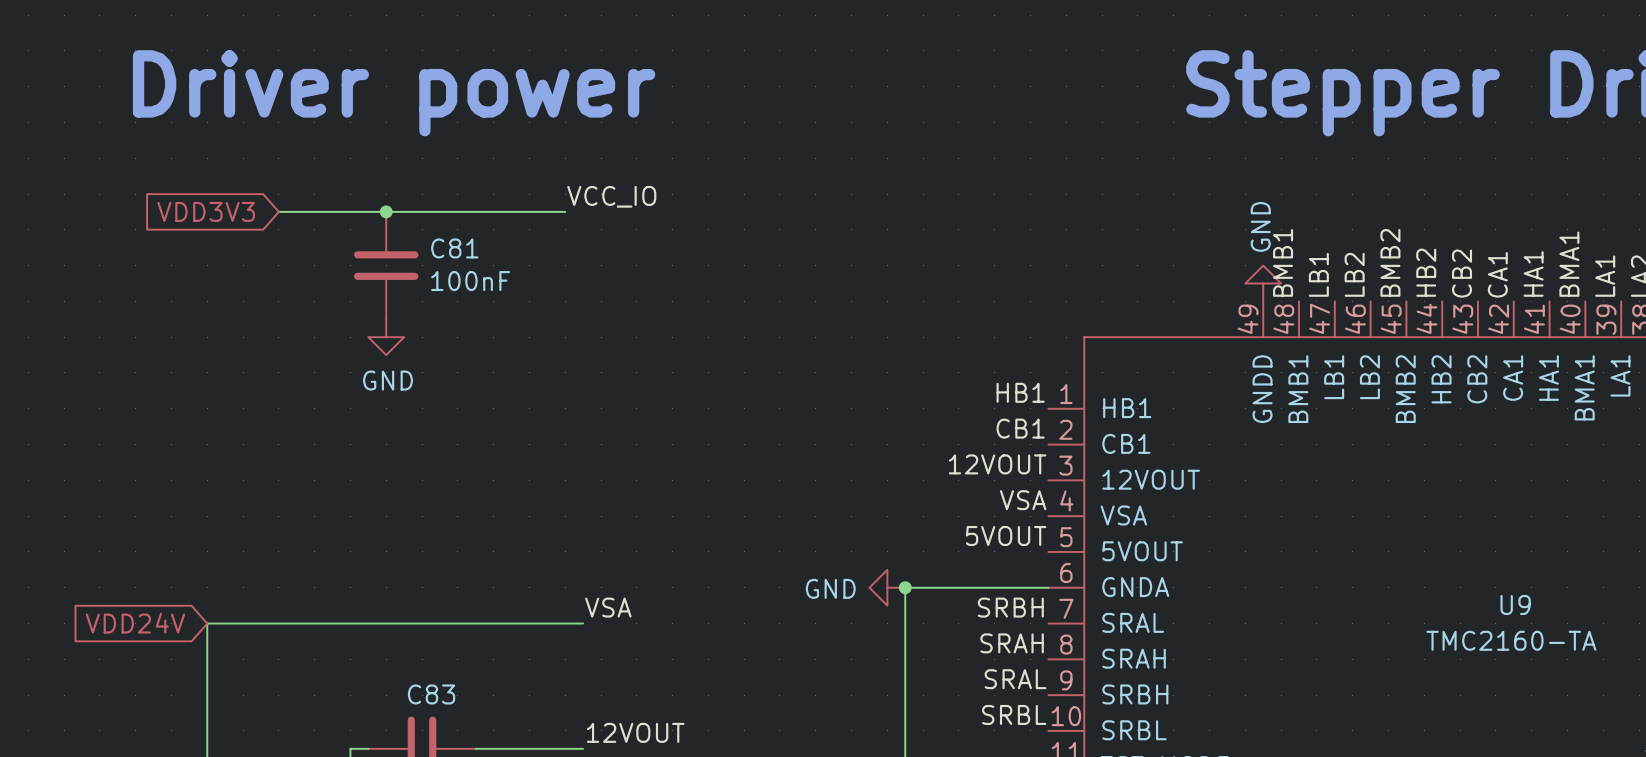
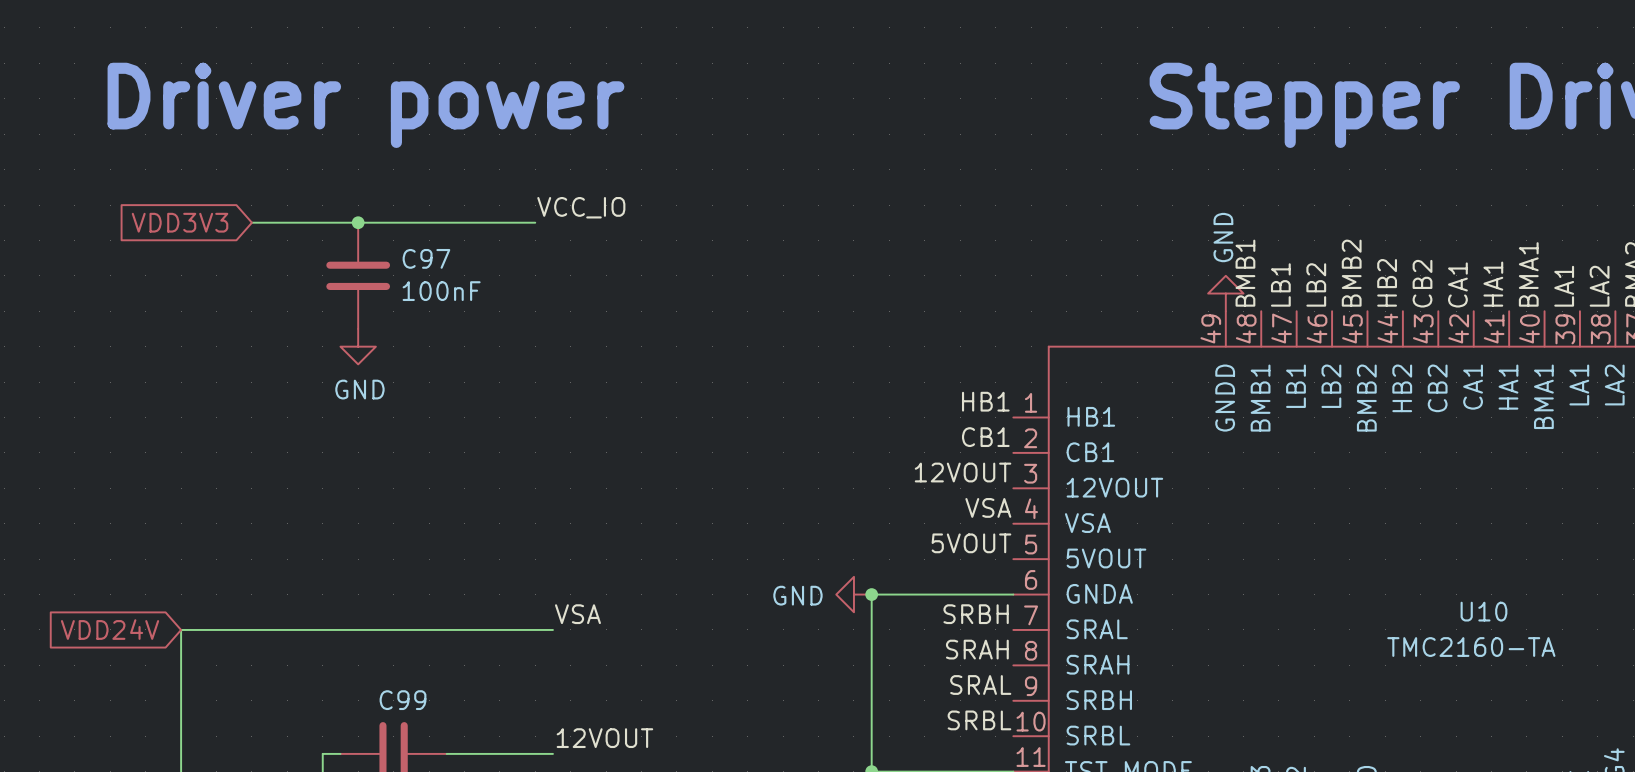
C81 name: C81 (454, 248) -> C97 (426, 258)
U9 name: U9 (1515, 604) -> U10 (1483, 611)
C83 name: C83 (431, 694) -> C99 (403, 700)

